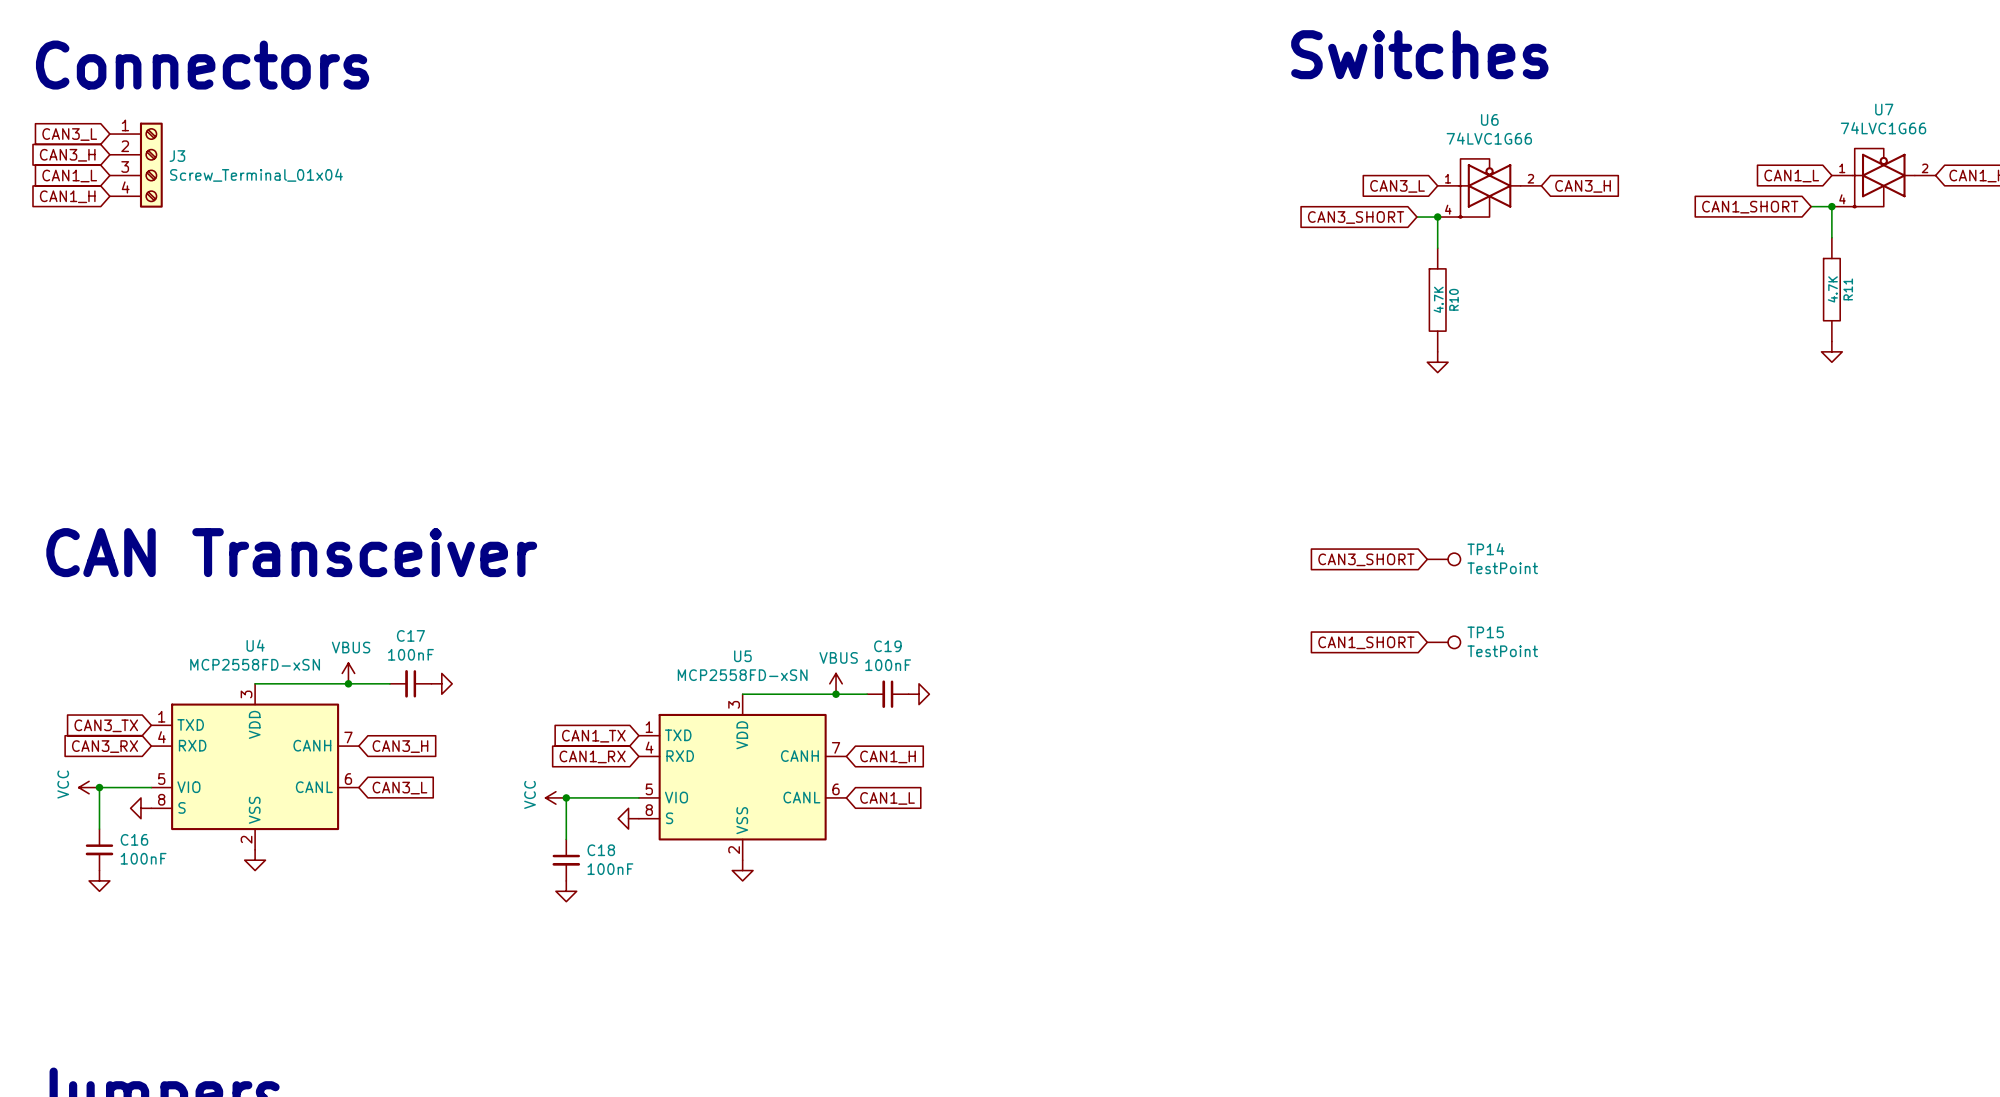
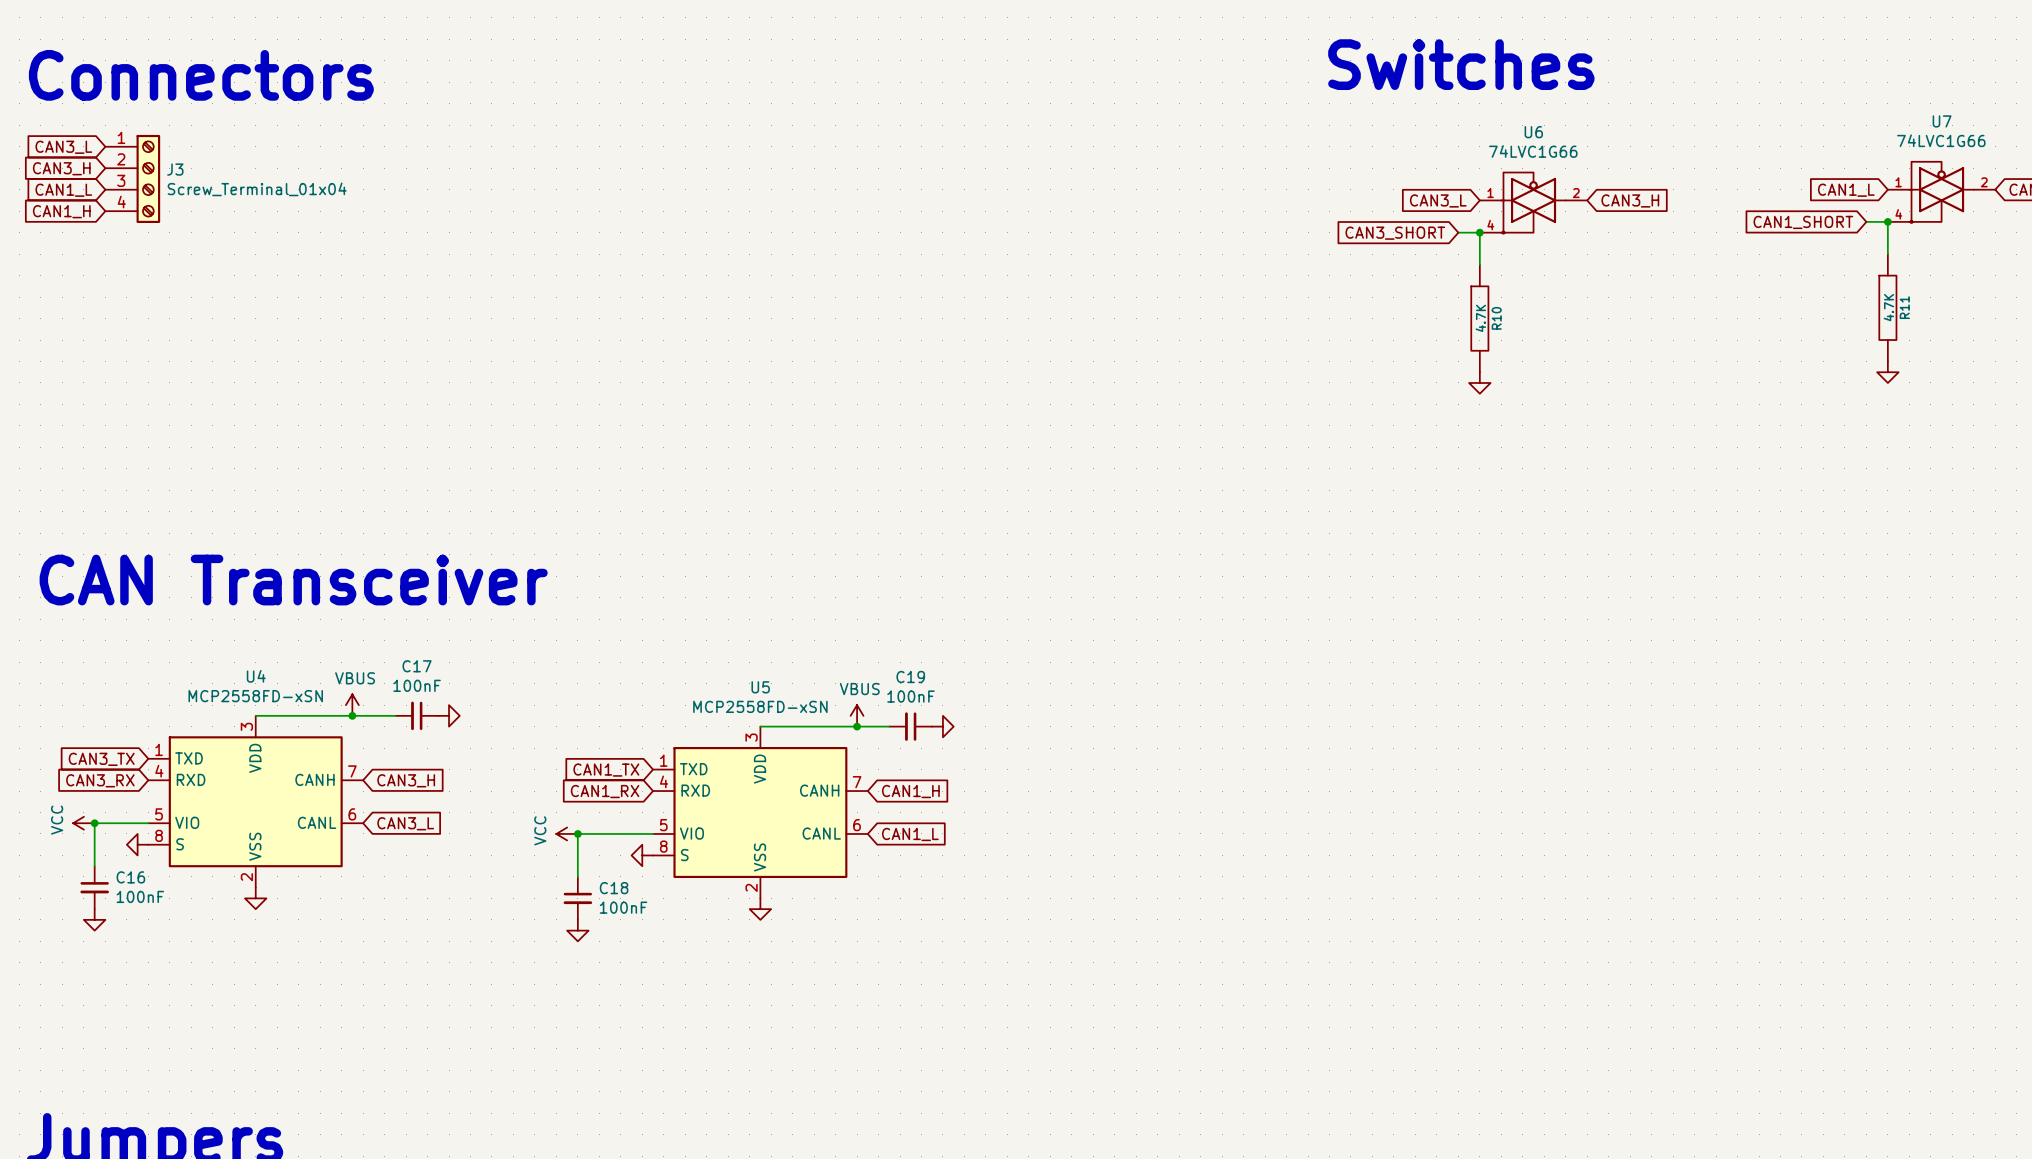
global label: CAN3_SHORT (1366, 559) -> none
TP14: TestPoint (1443, 559) -> none
global label: CAN1_SHORT (1366, 642) -> none
TP15: TestPoint (1443, 642) -> none

